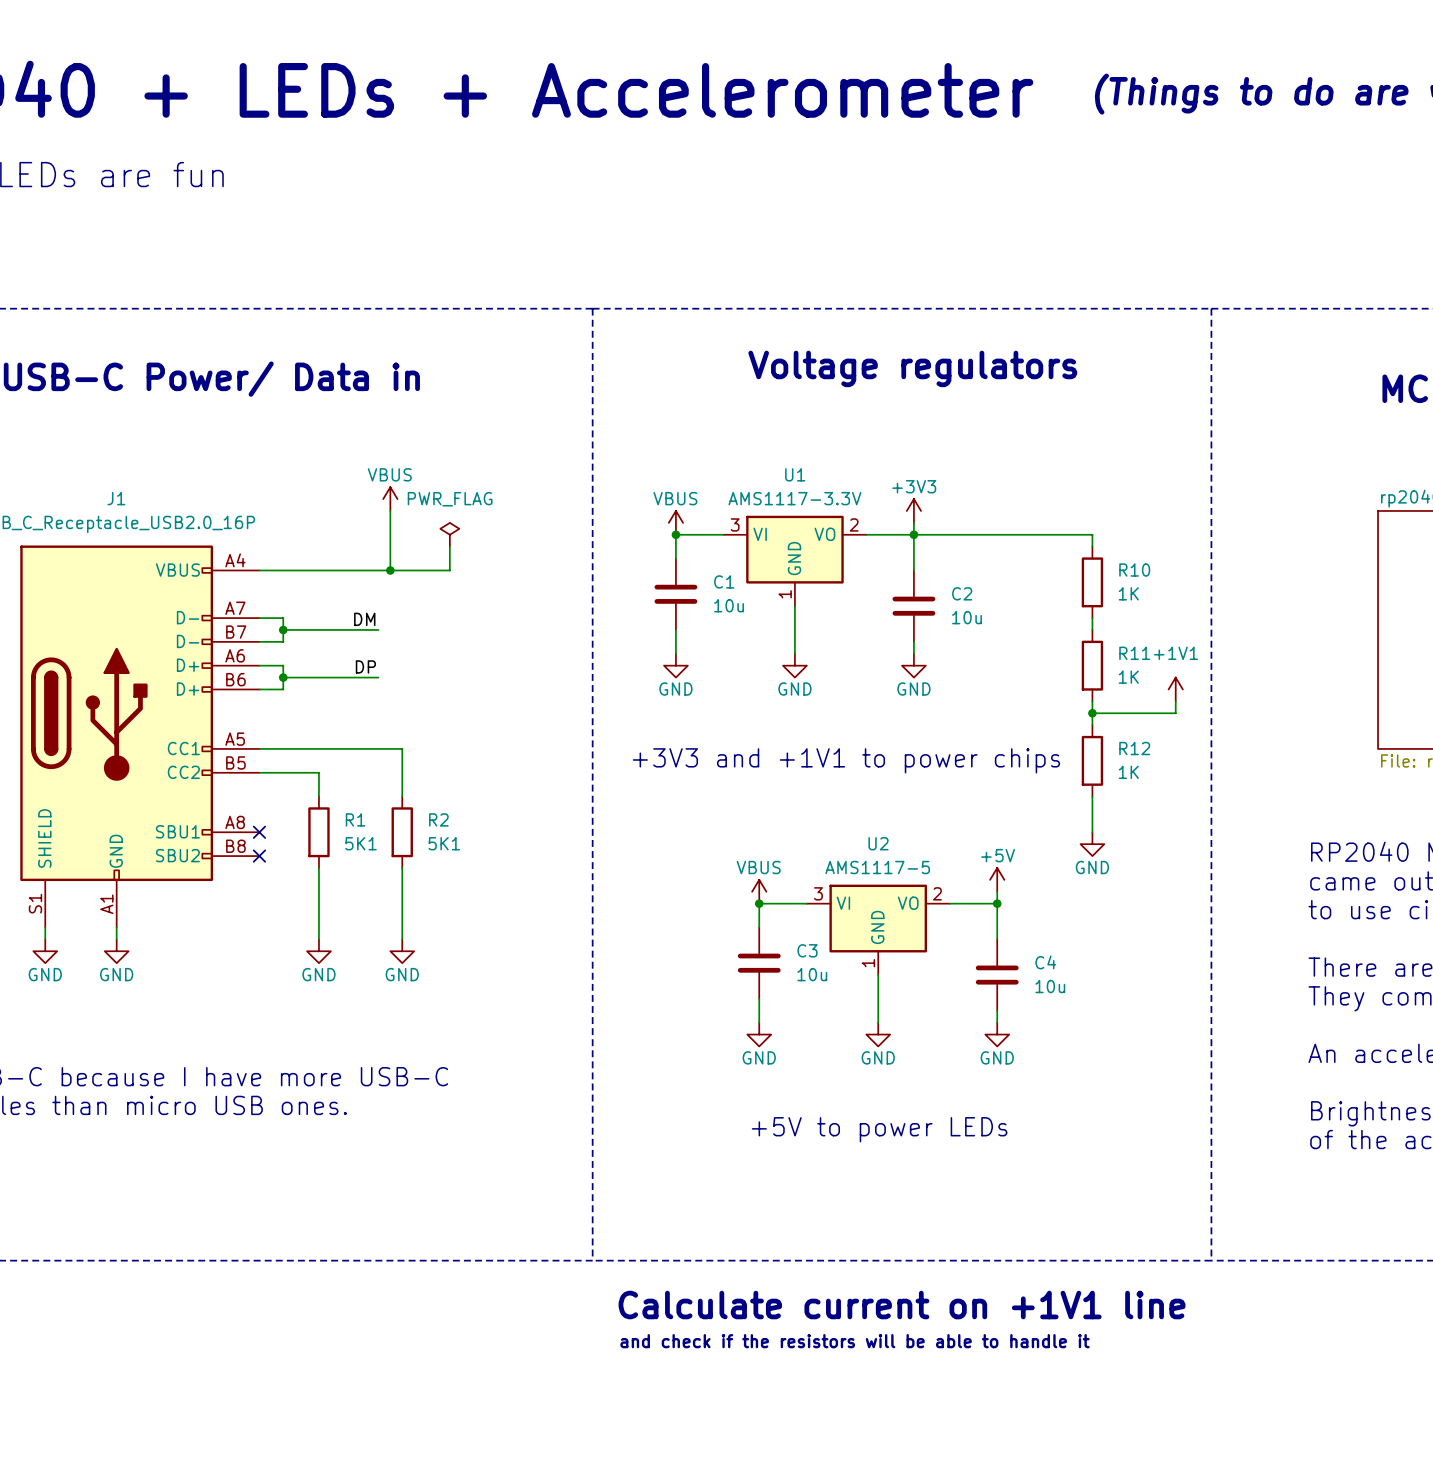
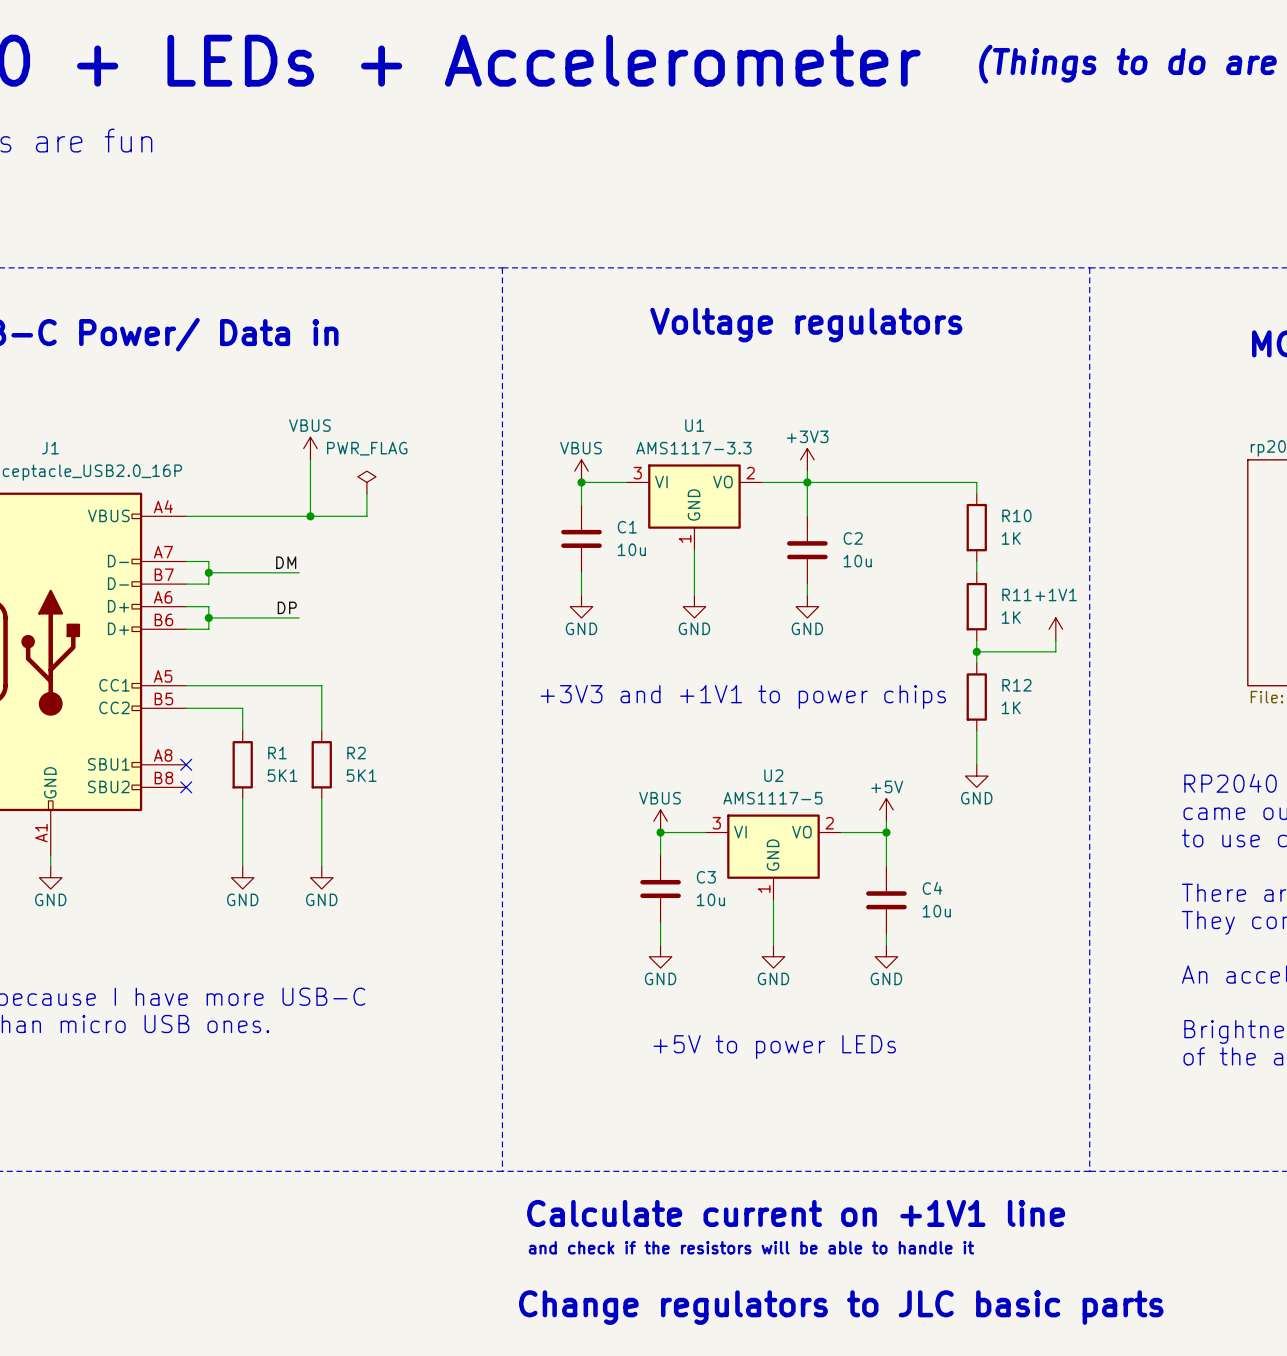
U1 value: AMS1117-3.3V (794, 498) -> AMS1117-3.3 (693, 448)
text: none -> Change regulators to JLC basic parts (841, 1307)

